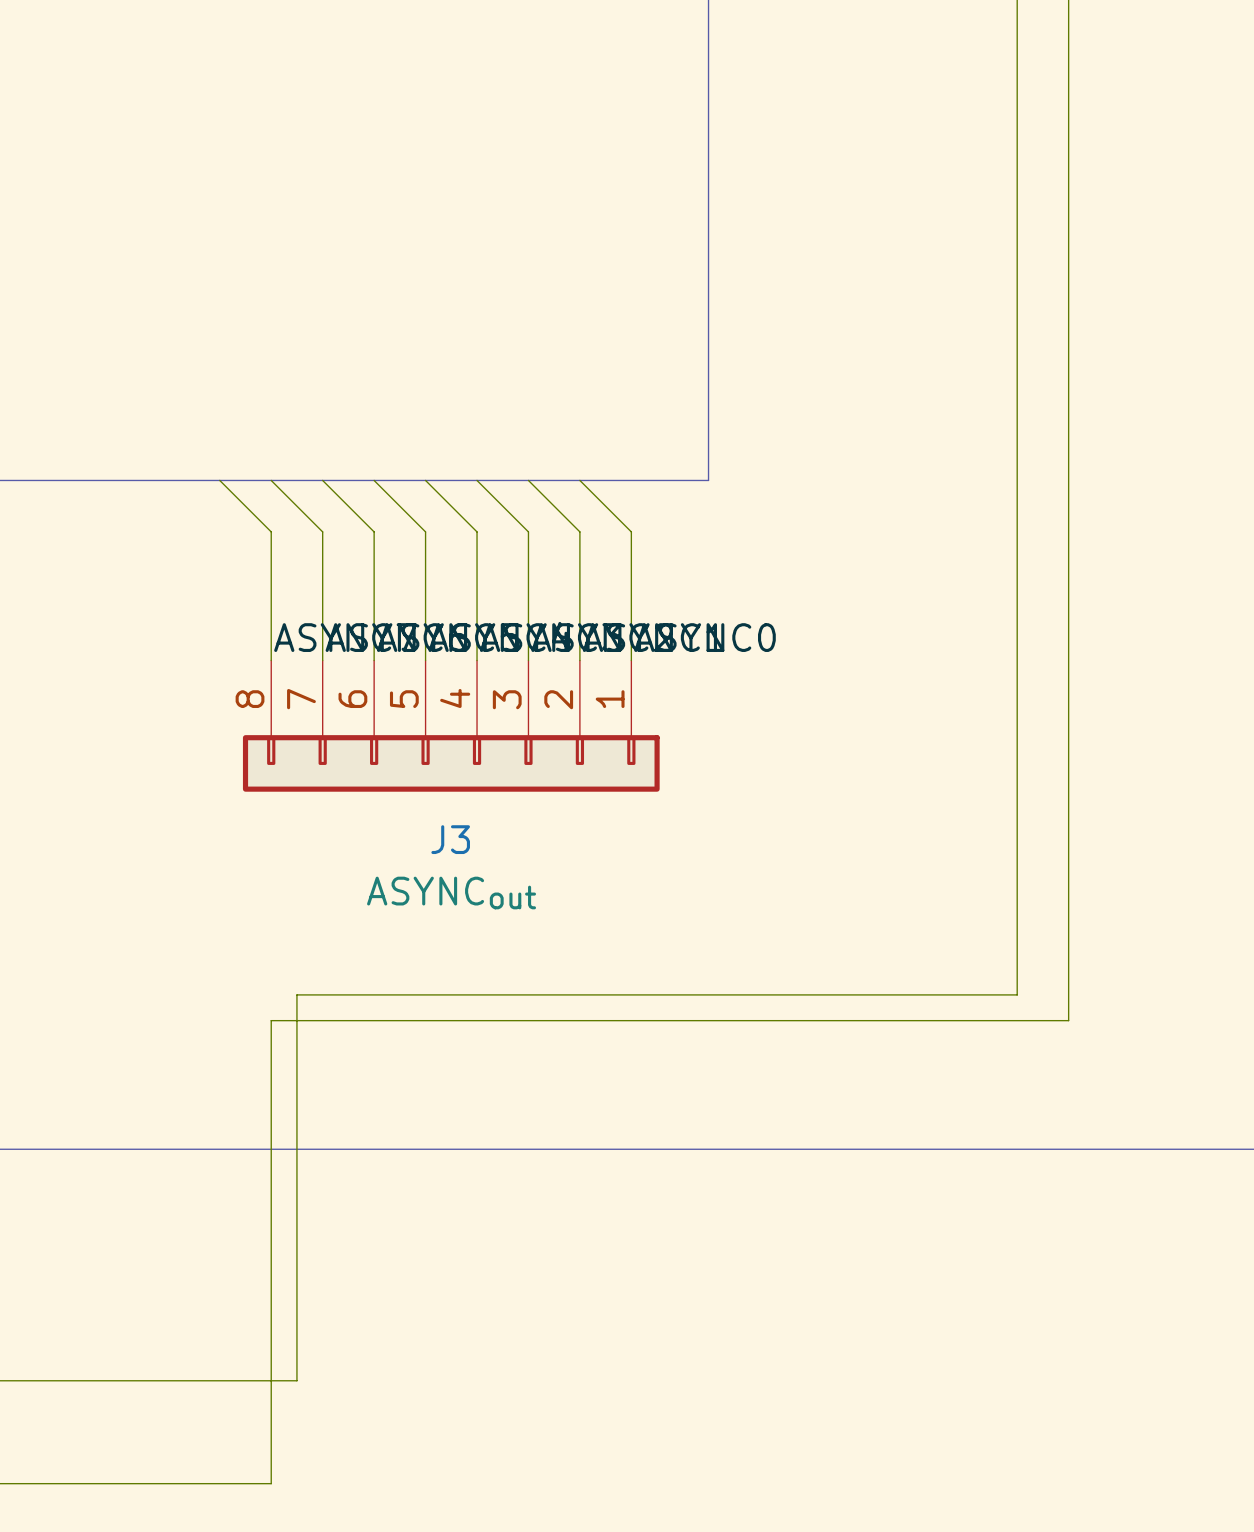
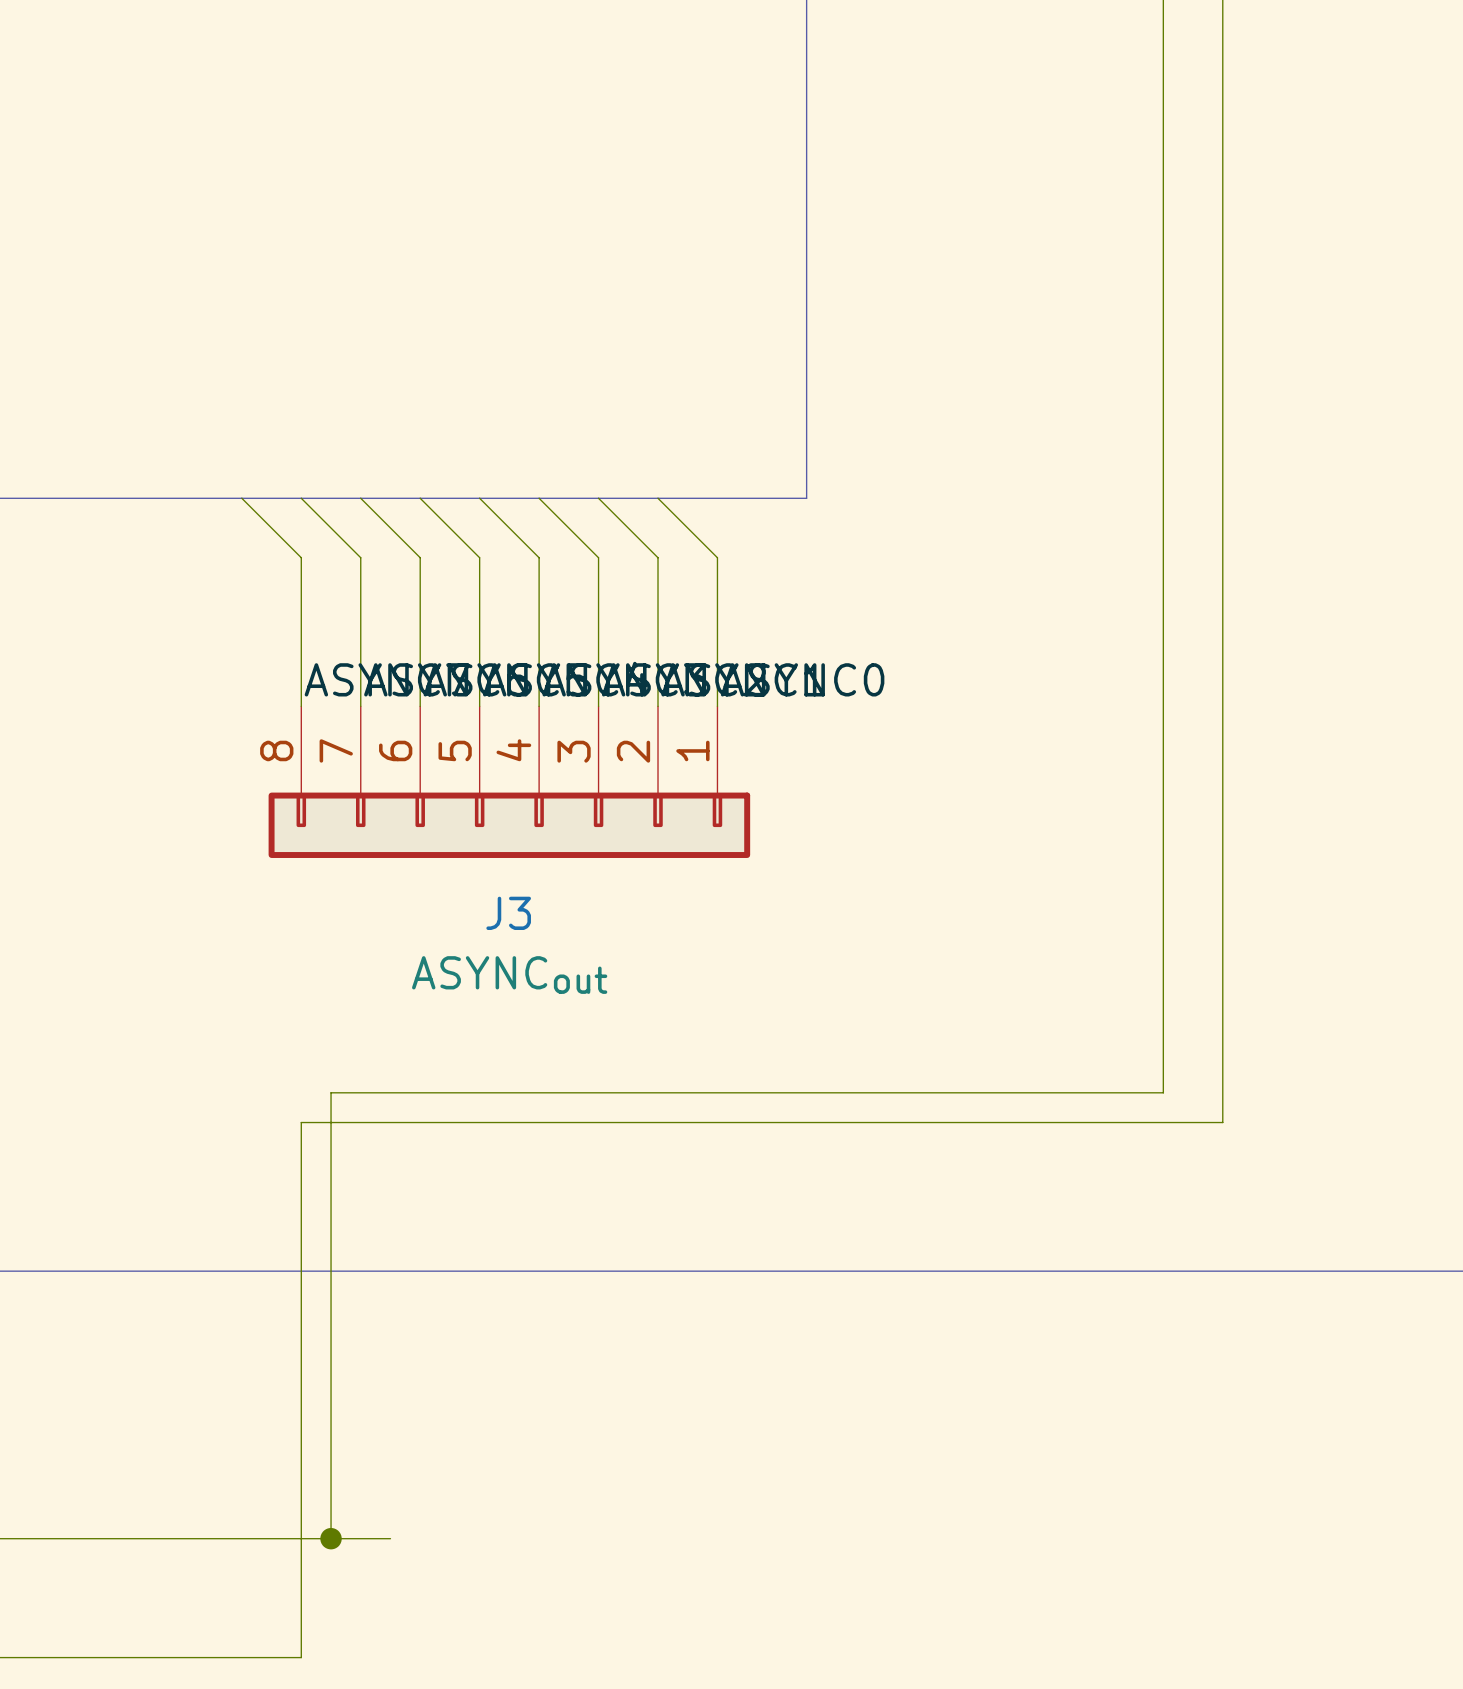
wire: none -> (331, 1538) (390, 1538)
junction: none -> (331, 1538)

